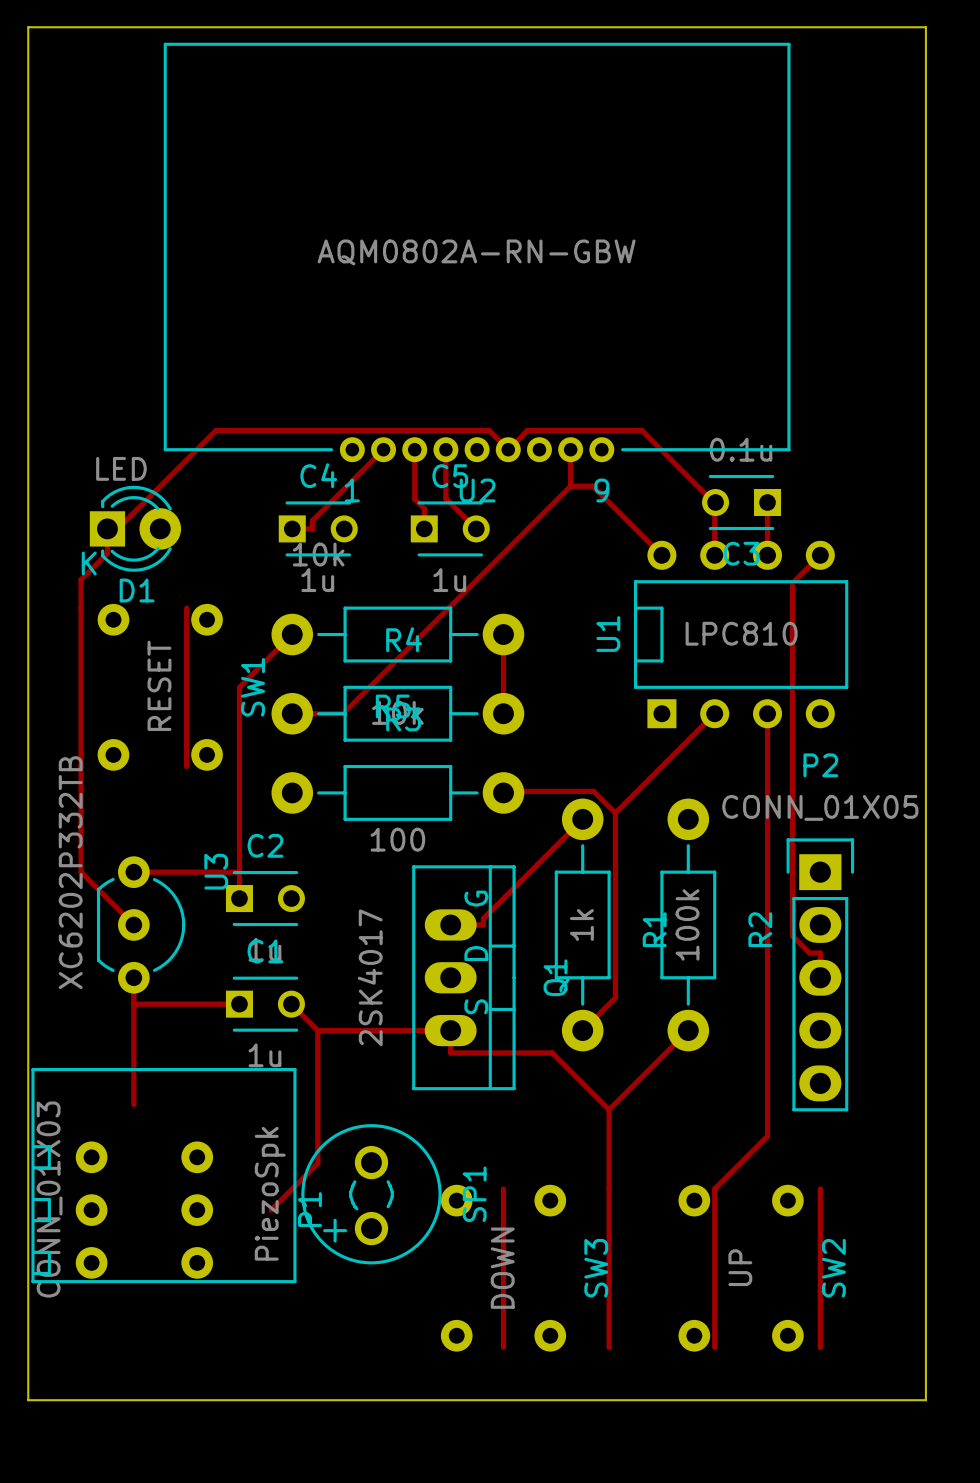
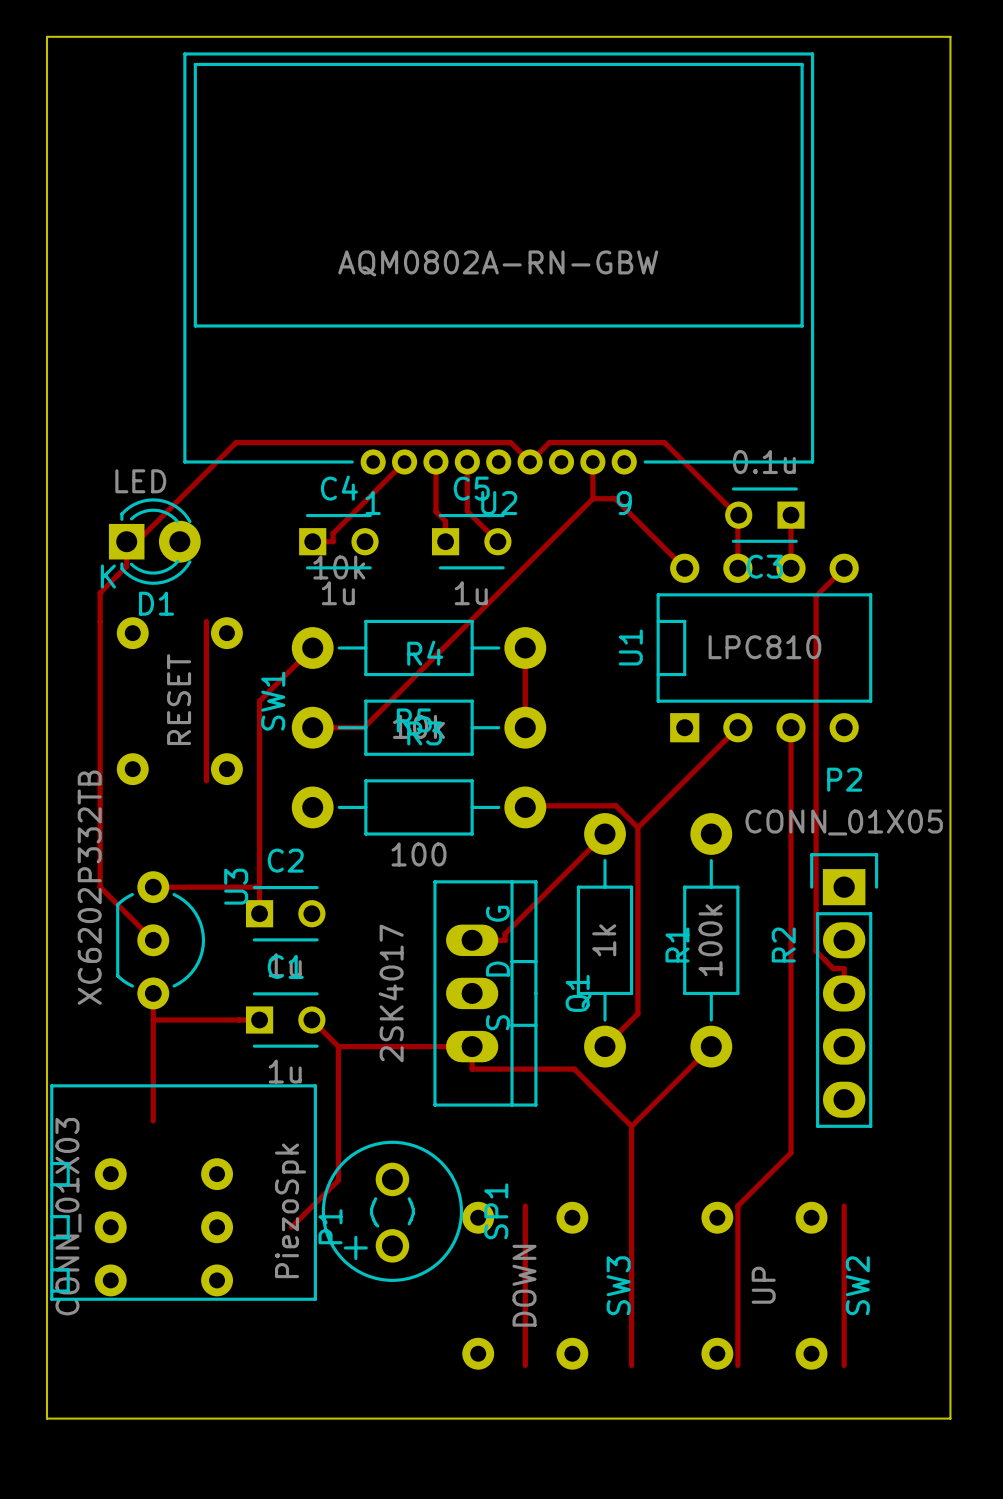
U2 footprint: [163, 42, 791, 463] -> [183, 52, 815, 475]

